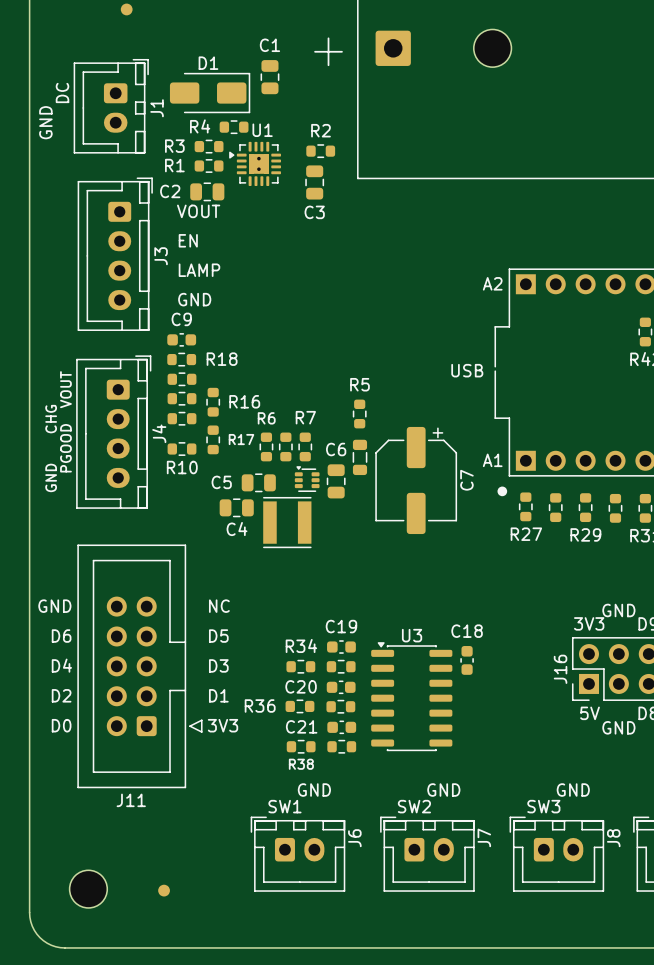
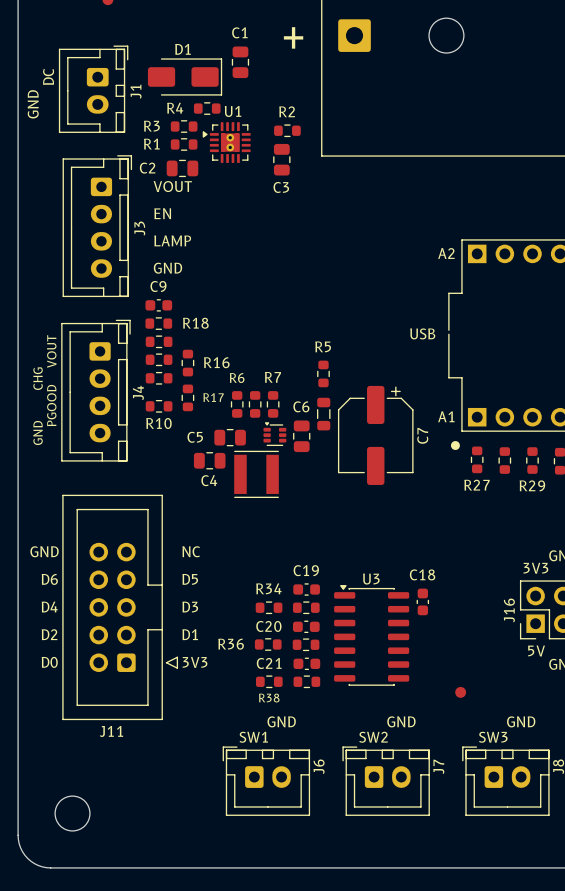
part: none -> (460, 692)
part: (164, 890) -> none

